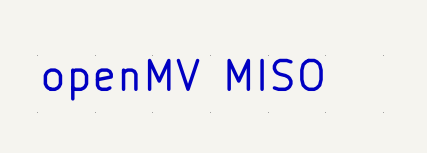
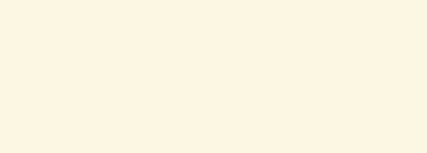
text: openMV MISO (183, 79) -> none

